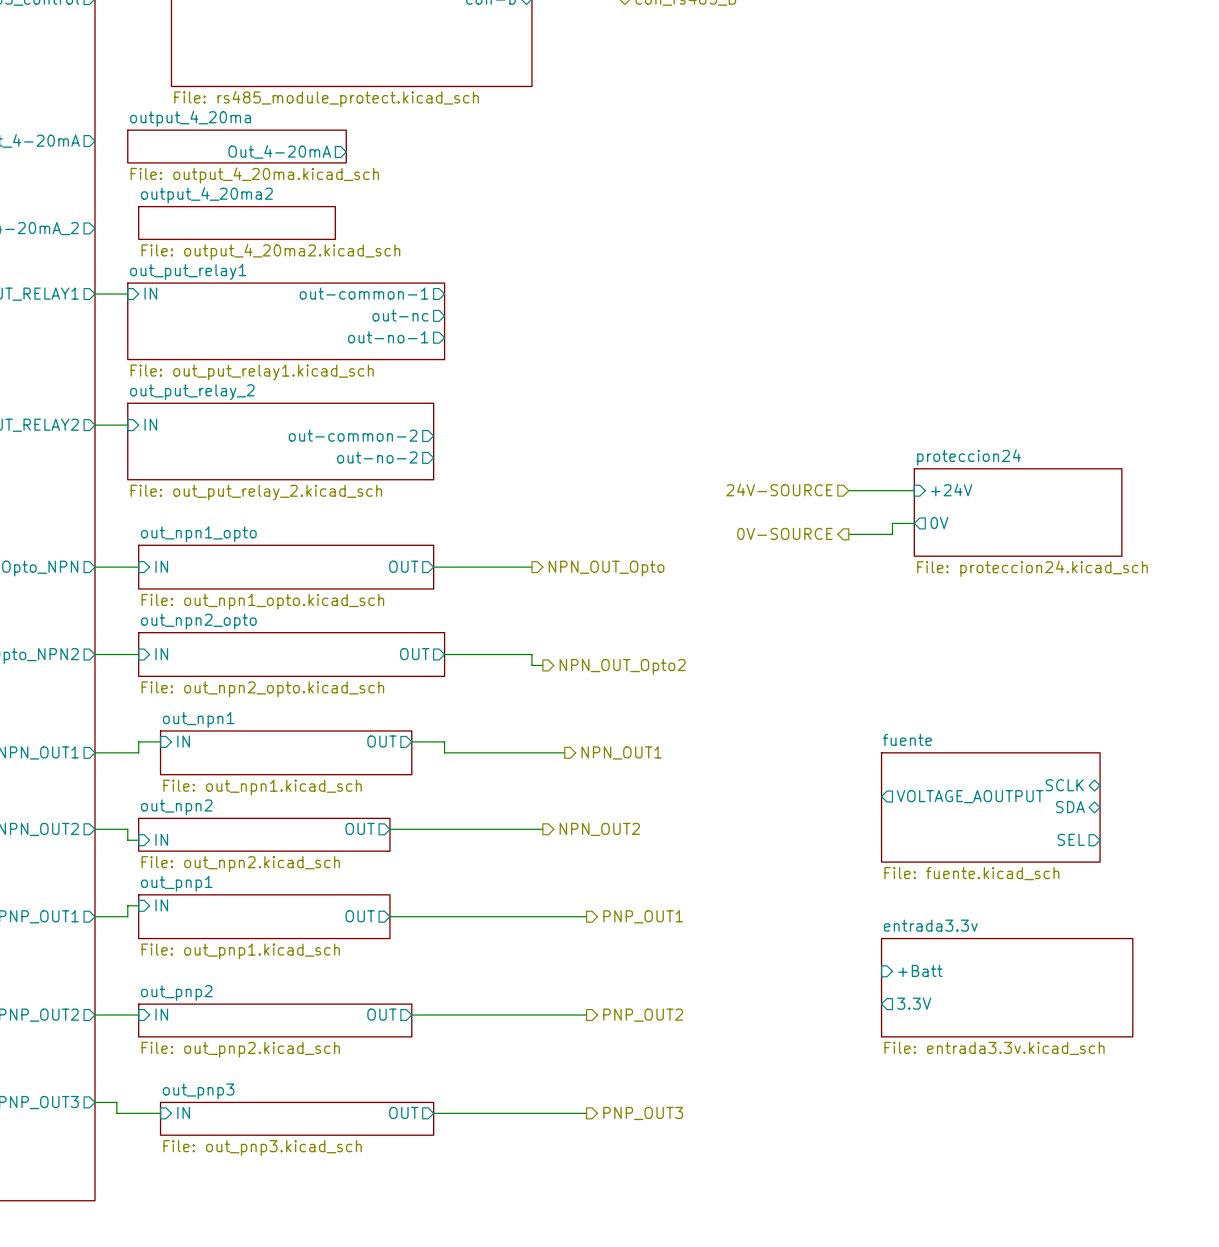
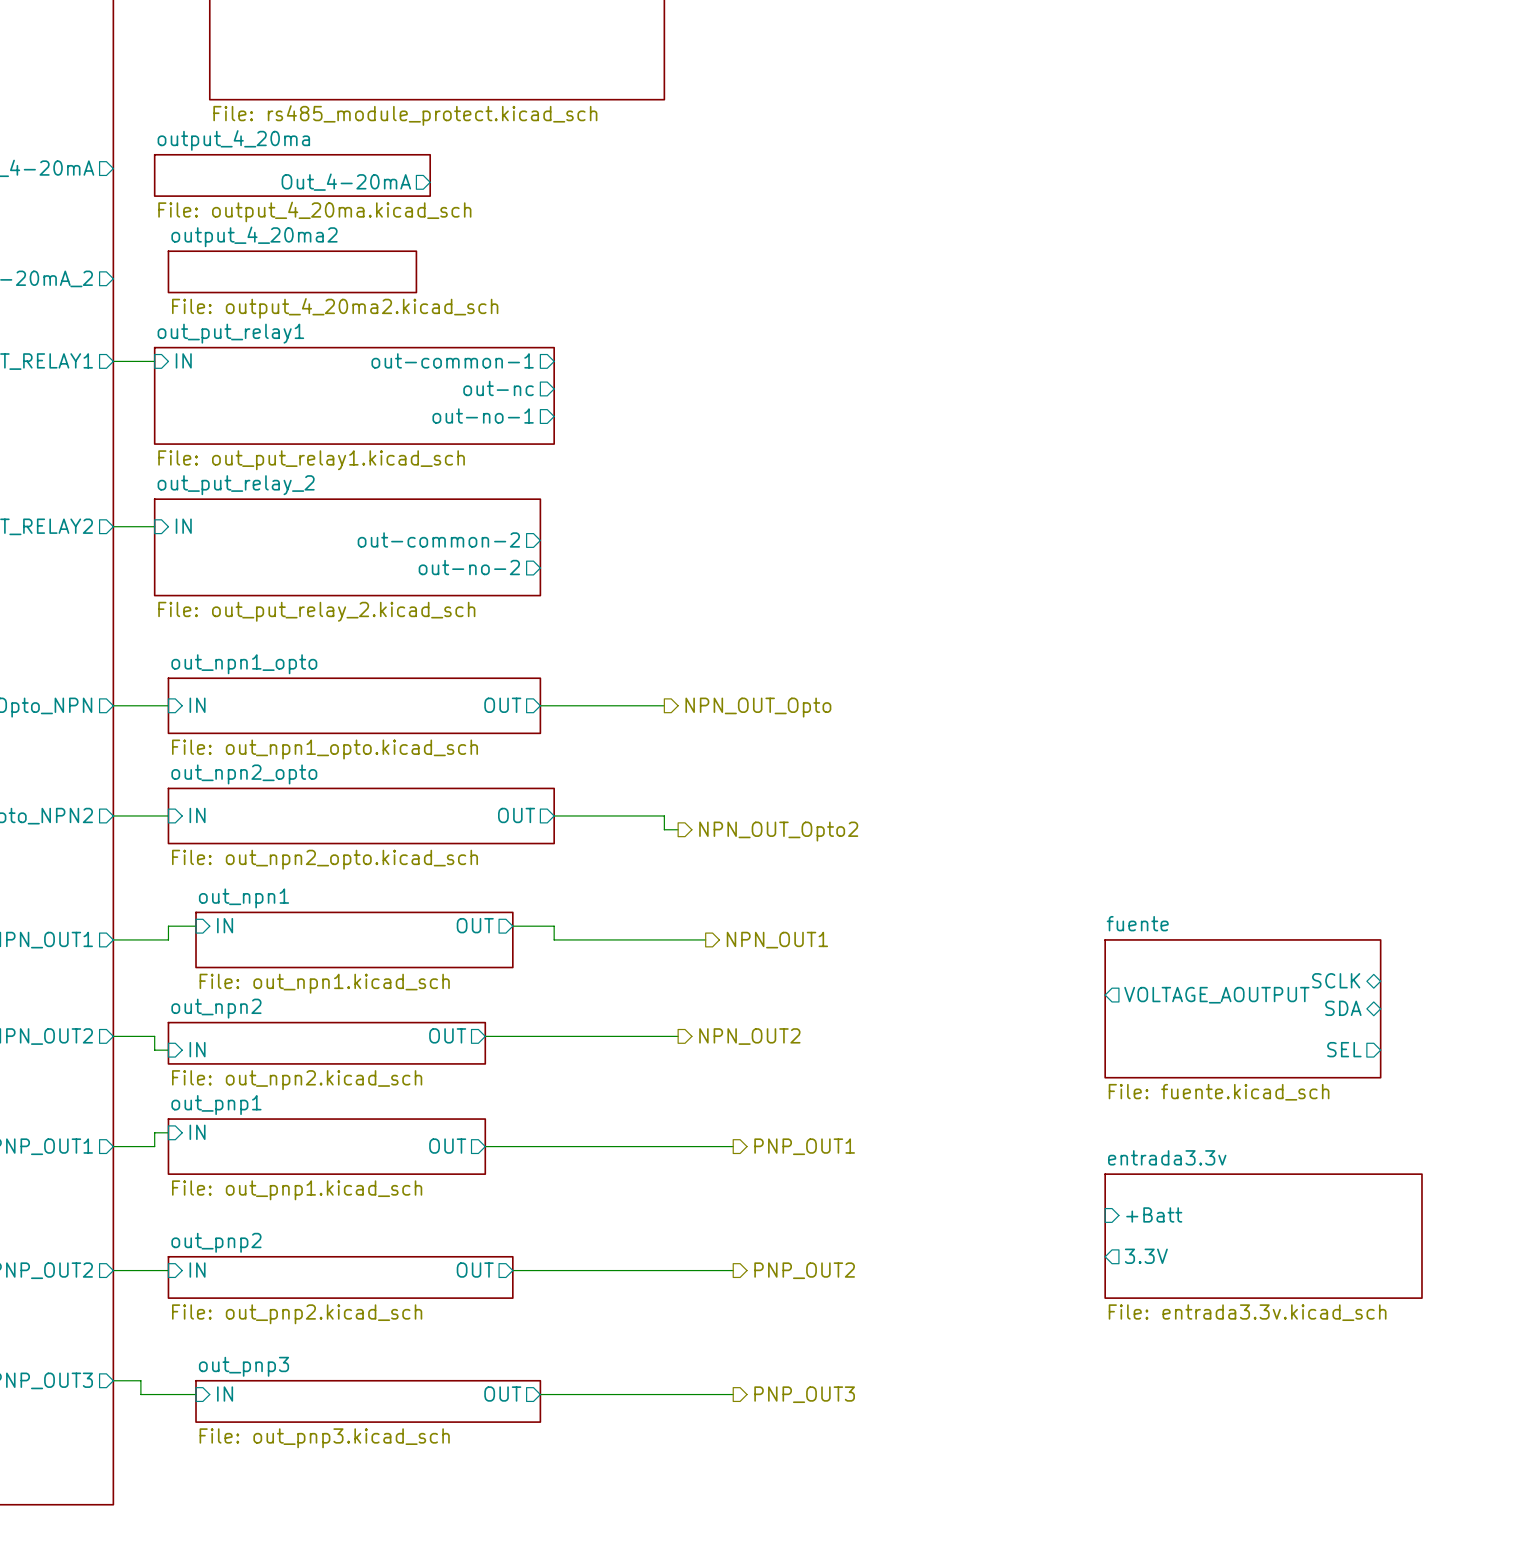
hierarchical label: 24V-SOURCE (779, 489) -> none
sheet pin: +24V (951, 489) -> none
wire: (848, 490) (914, 490) -> none
sheet proteccion24: File: proteccion24.kicad_sch (1018, 512) -> none
wire: (914, 523) (892, 523) (892, 534) (848, 534) -> none
sheet pin: 0V (939, 523) -> none
hierarchical label: 0V-SOURCE (784, 533) -> none

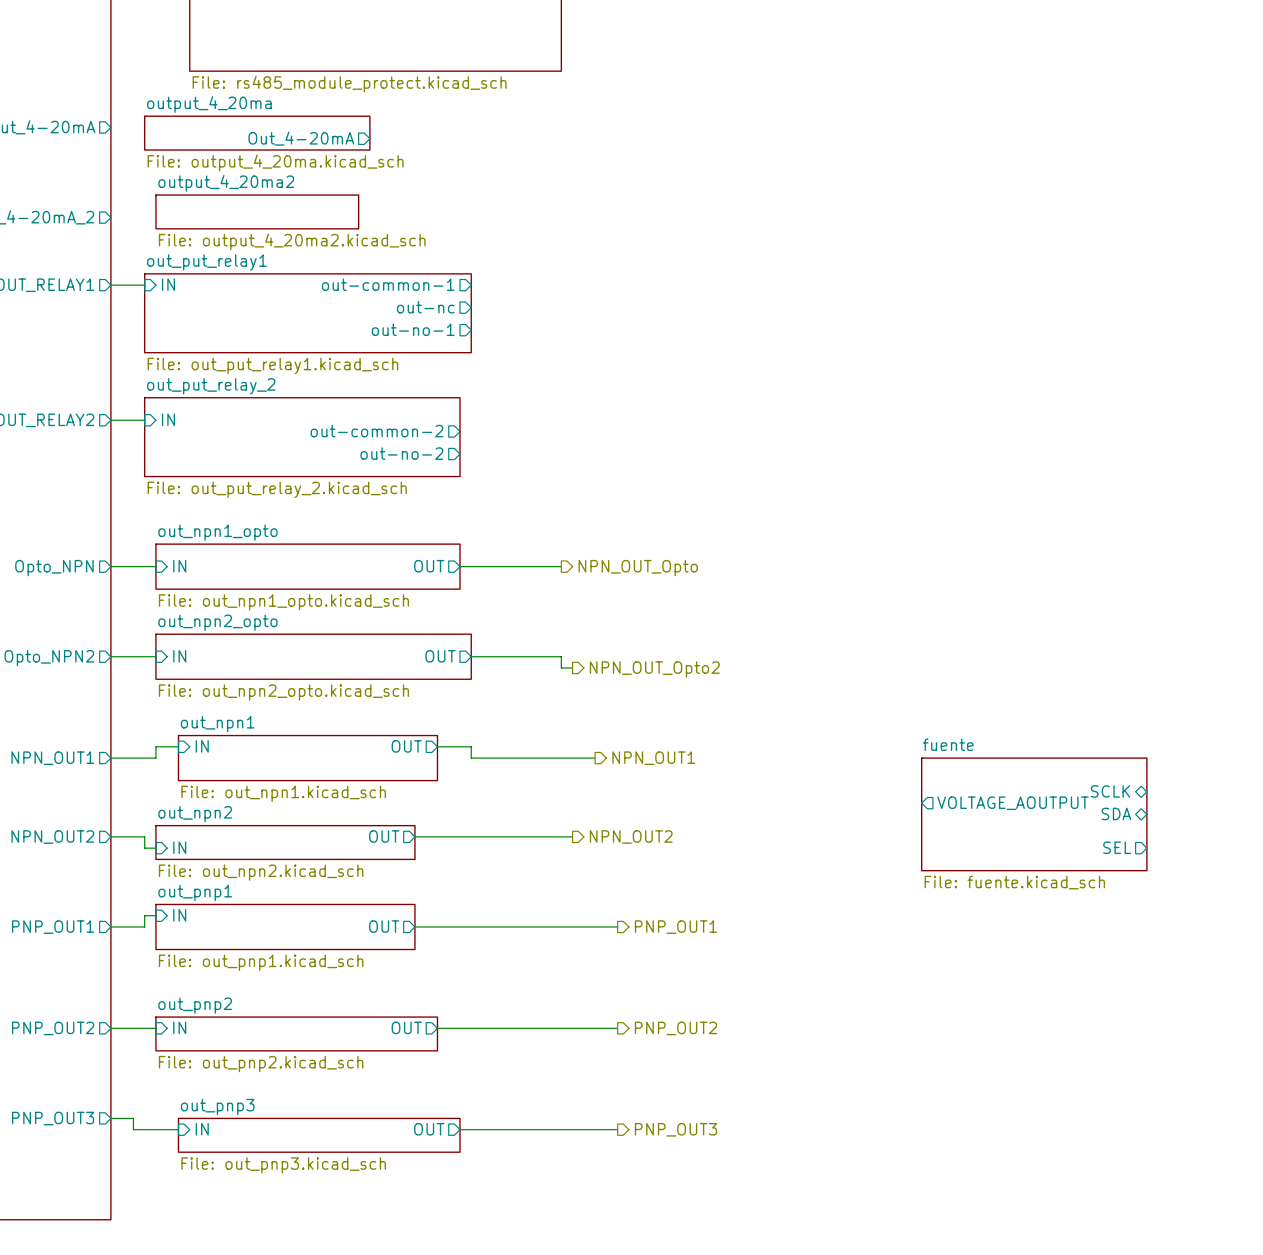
sheet pin: +Batt (1154, 1214) -> none
sheet entrada3.3v: File: entrada3.3v.kicad_sch (1263, 1236) -> none
sheet pin: 3.3V (1146, 1256) -> none

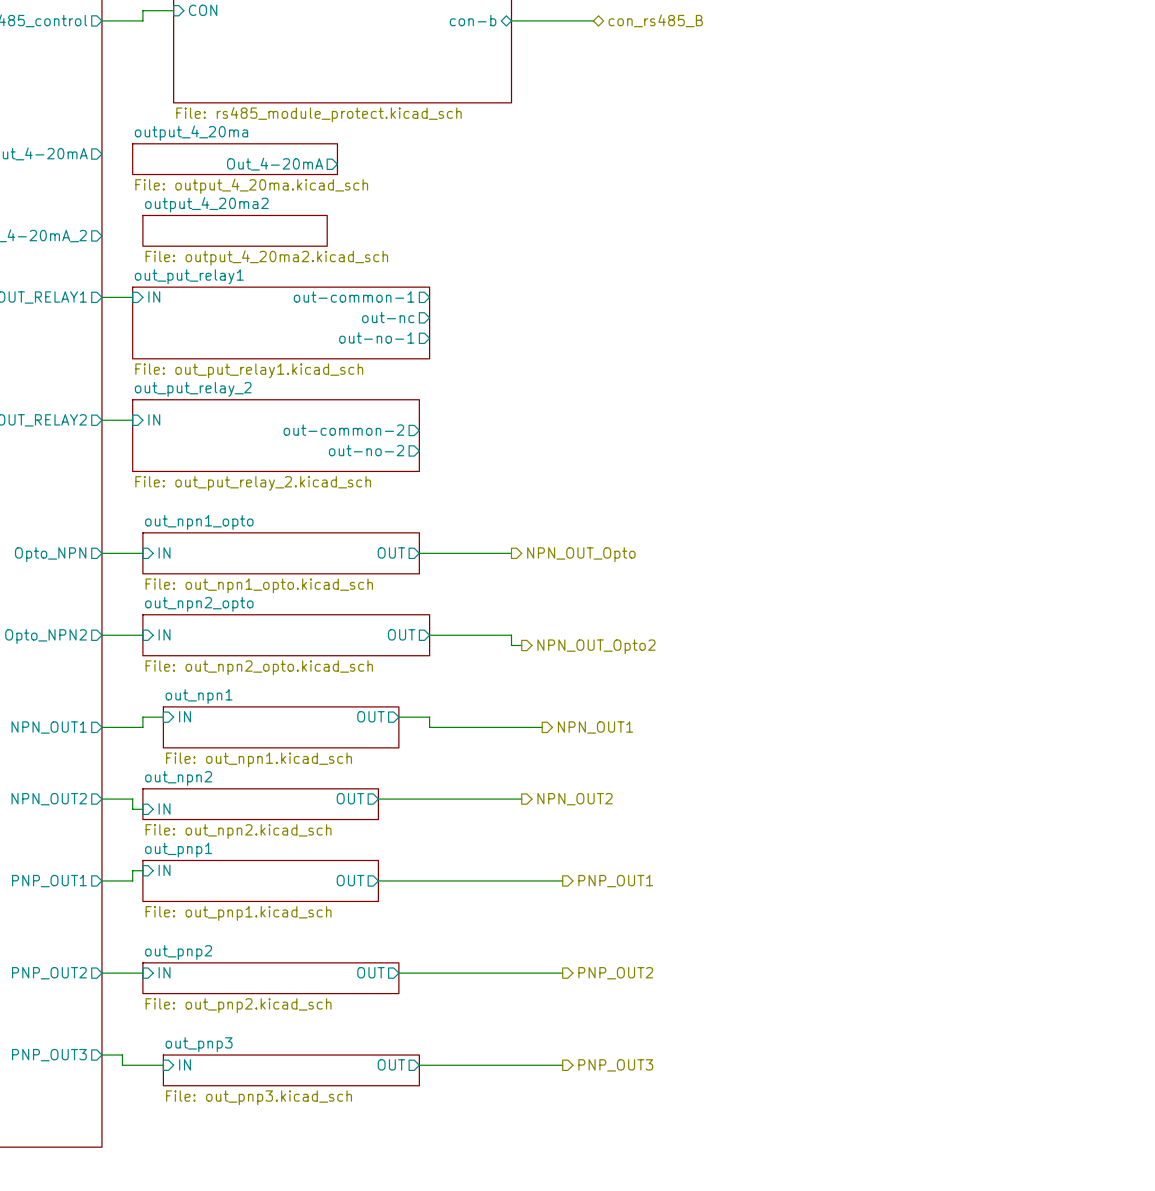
sheet pin: SCLK (1110, 791) -> none
sheet pin: VOLTAGE_AOUTPUT (1013, 803) -> none
sheet pin: SDA (1116, 813) -> none
sheet fuente: File: fuente.kicad_sch (1034, 814) -> none
sheet pin: SEL (1117, 847) -> none

